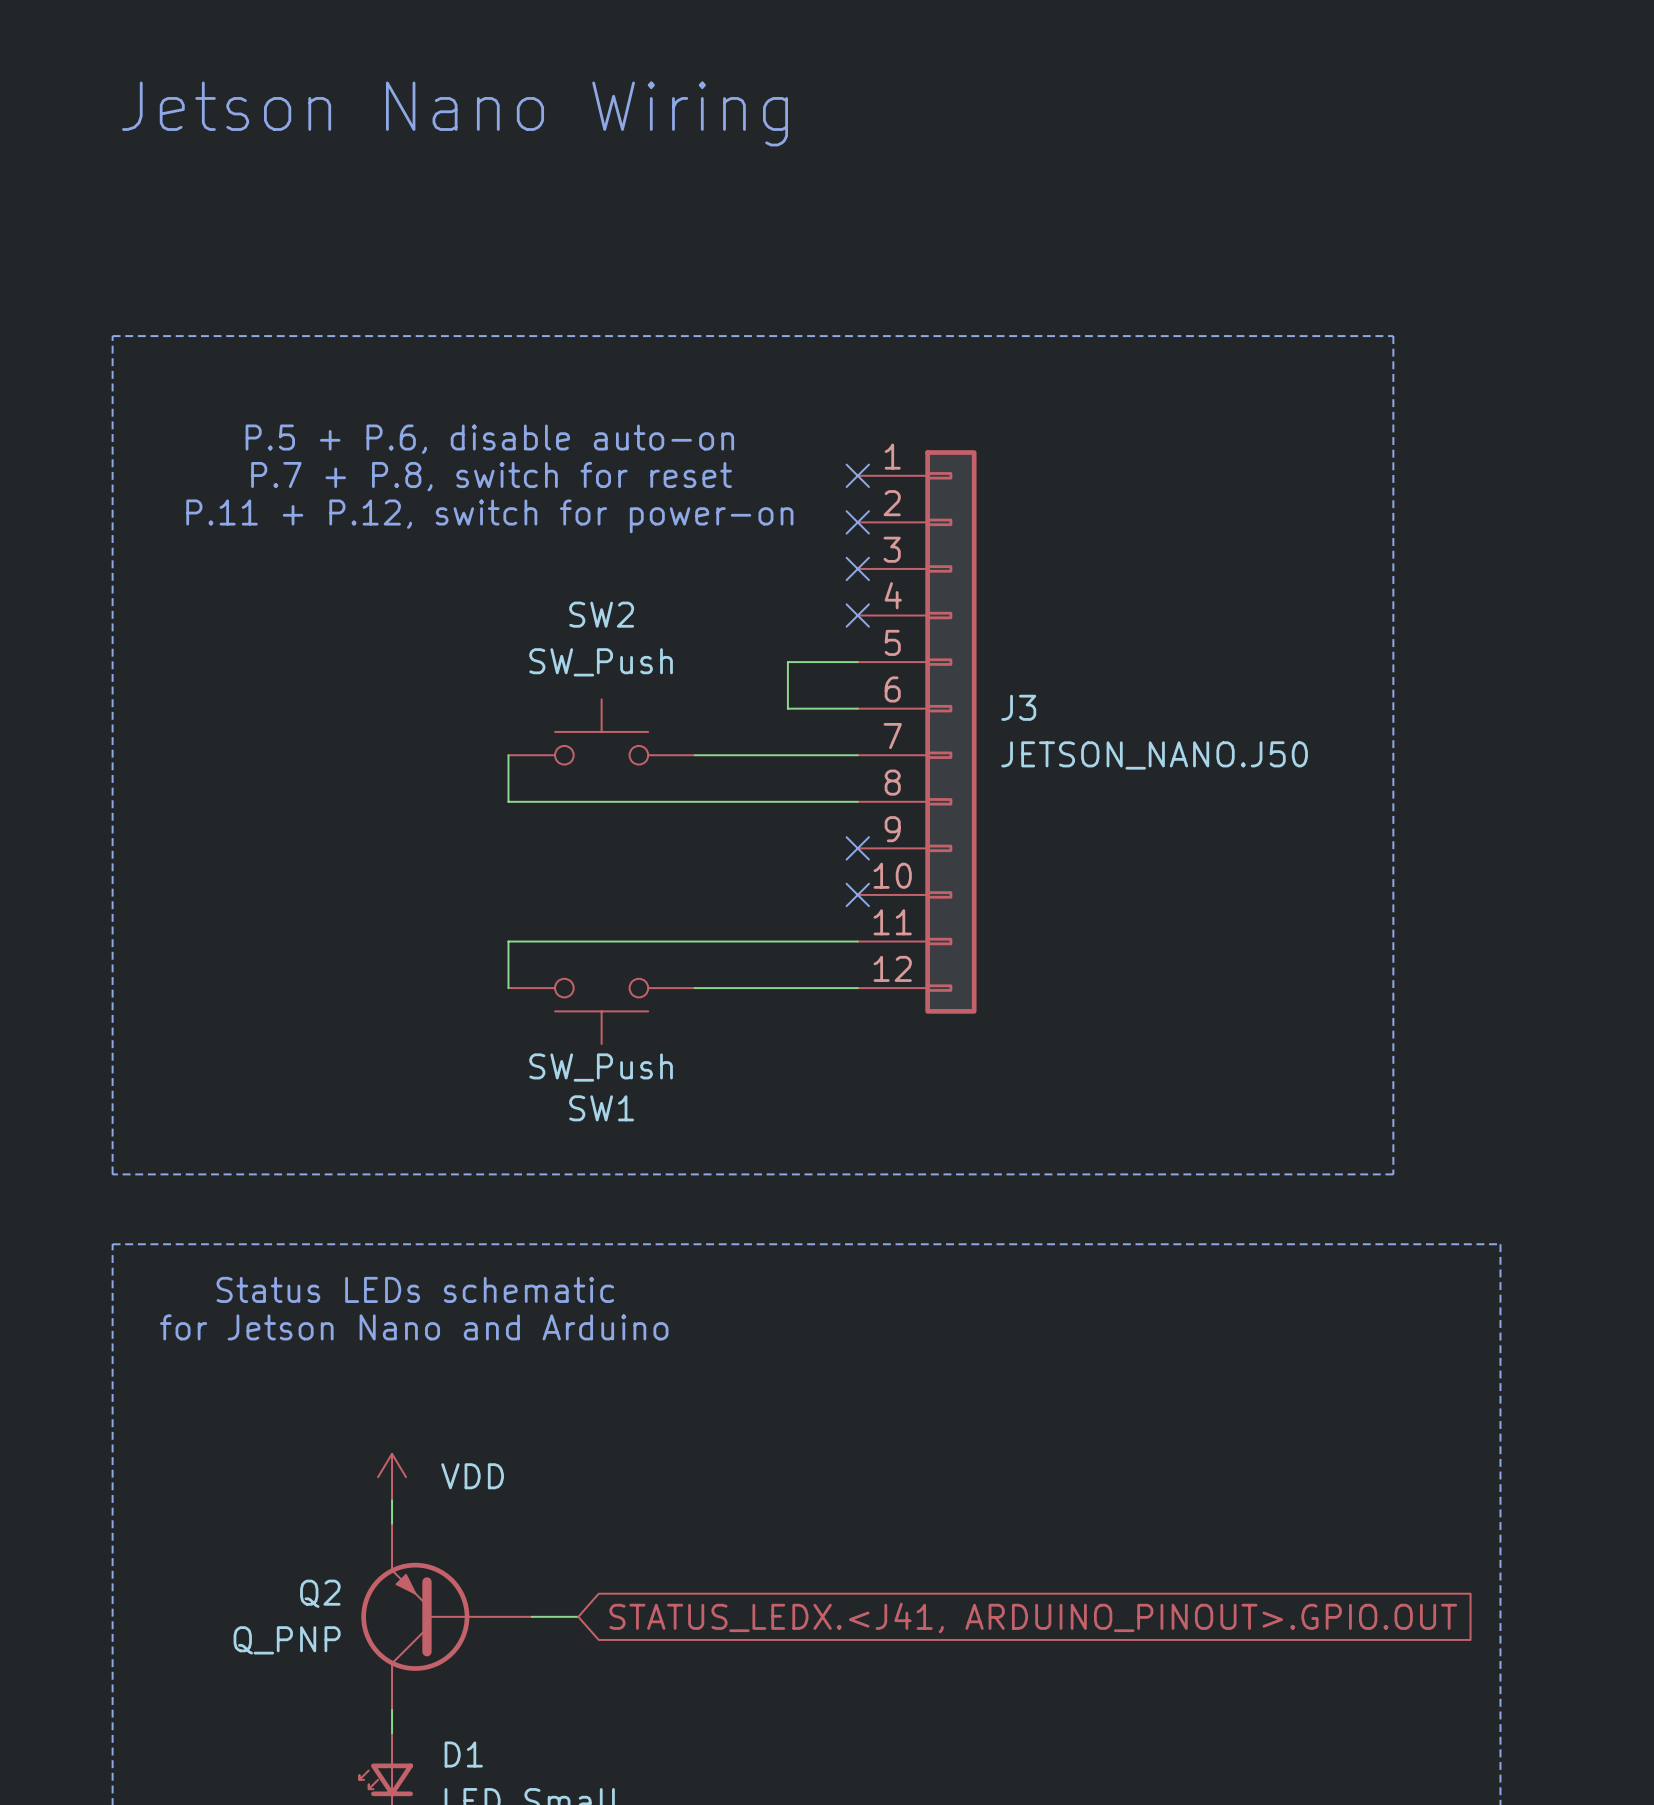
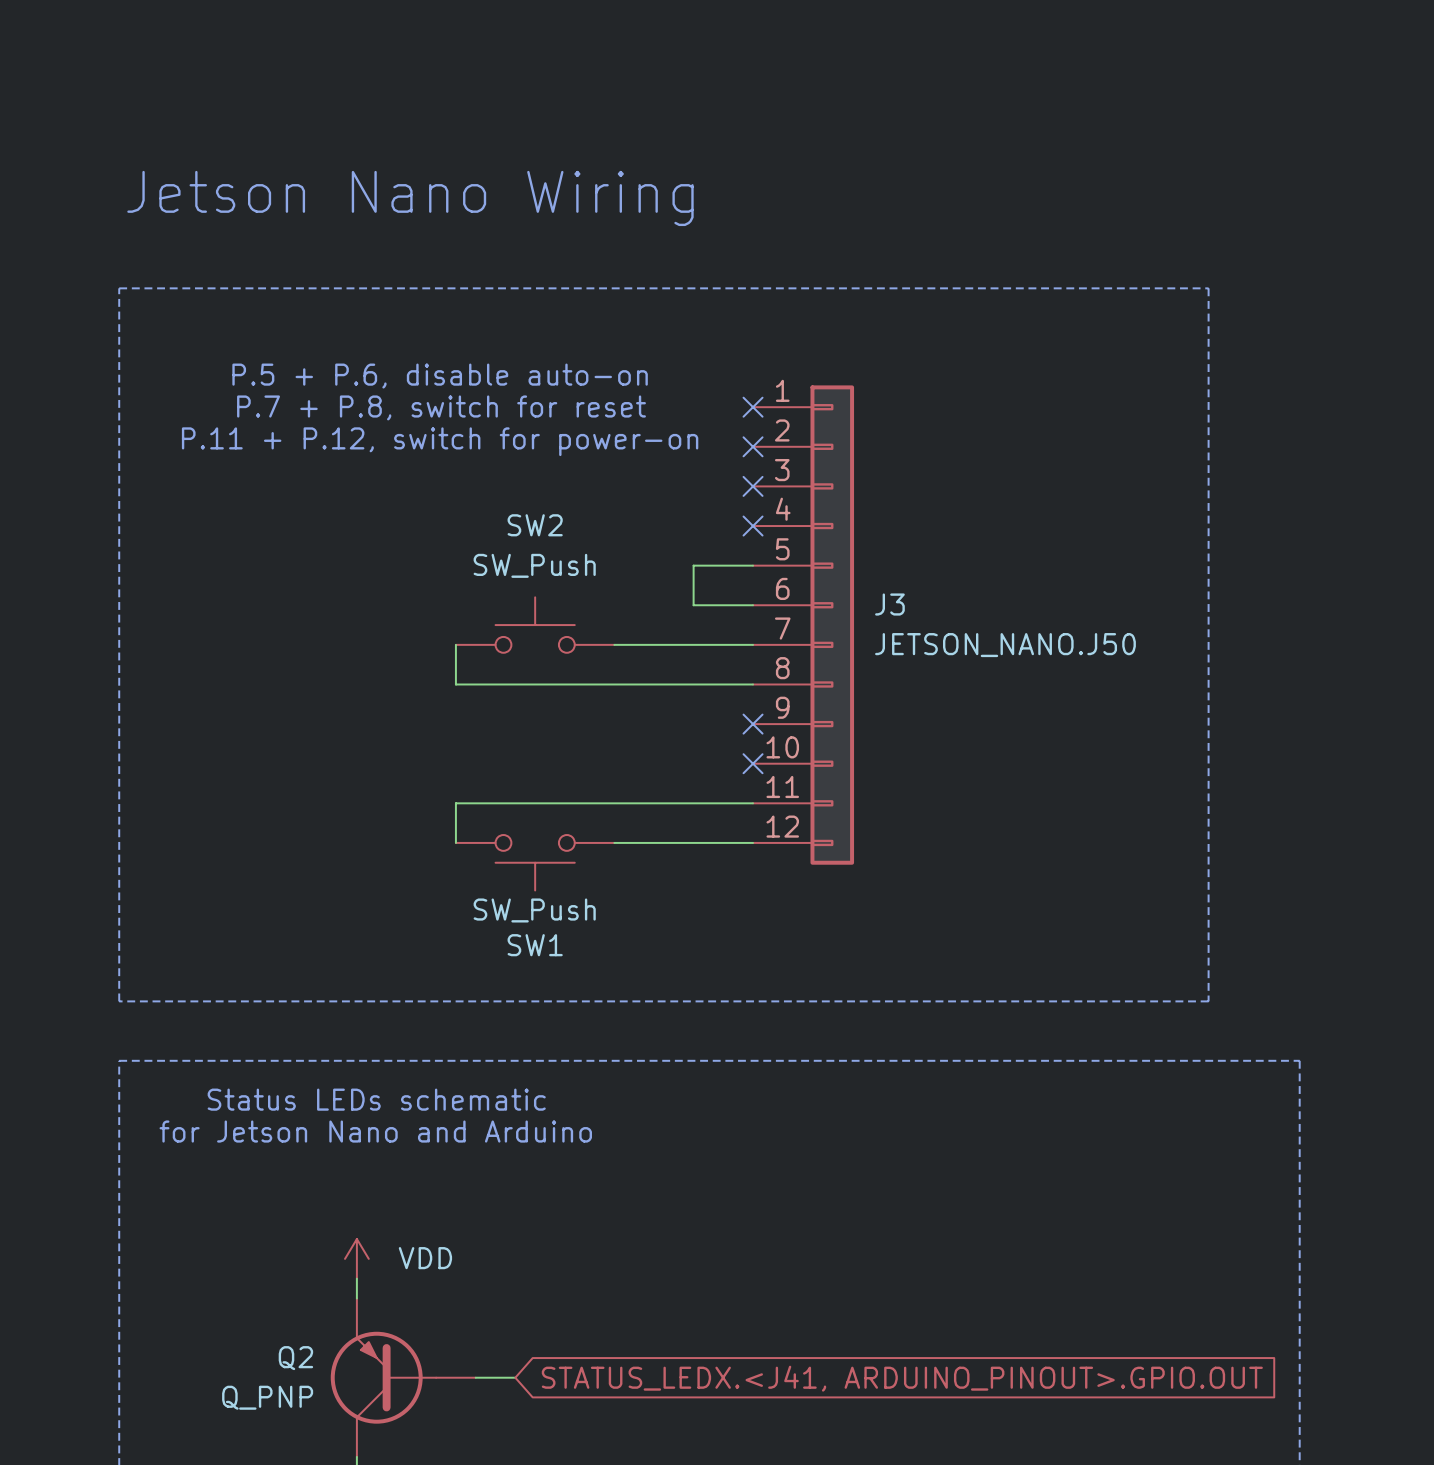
text position: Jetson Nano Wiring (455, 113) -> Jetson Nano Wiring (410, 198)

